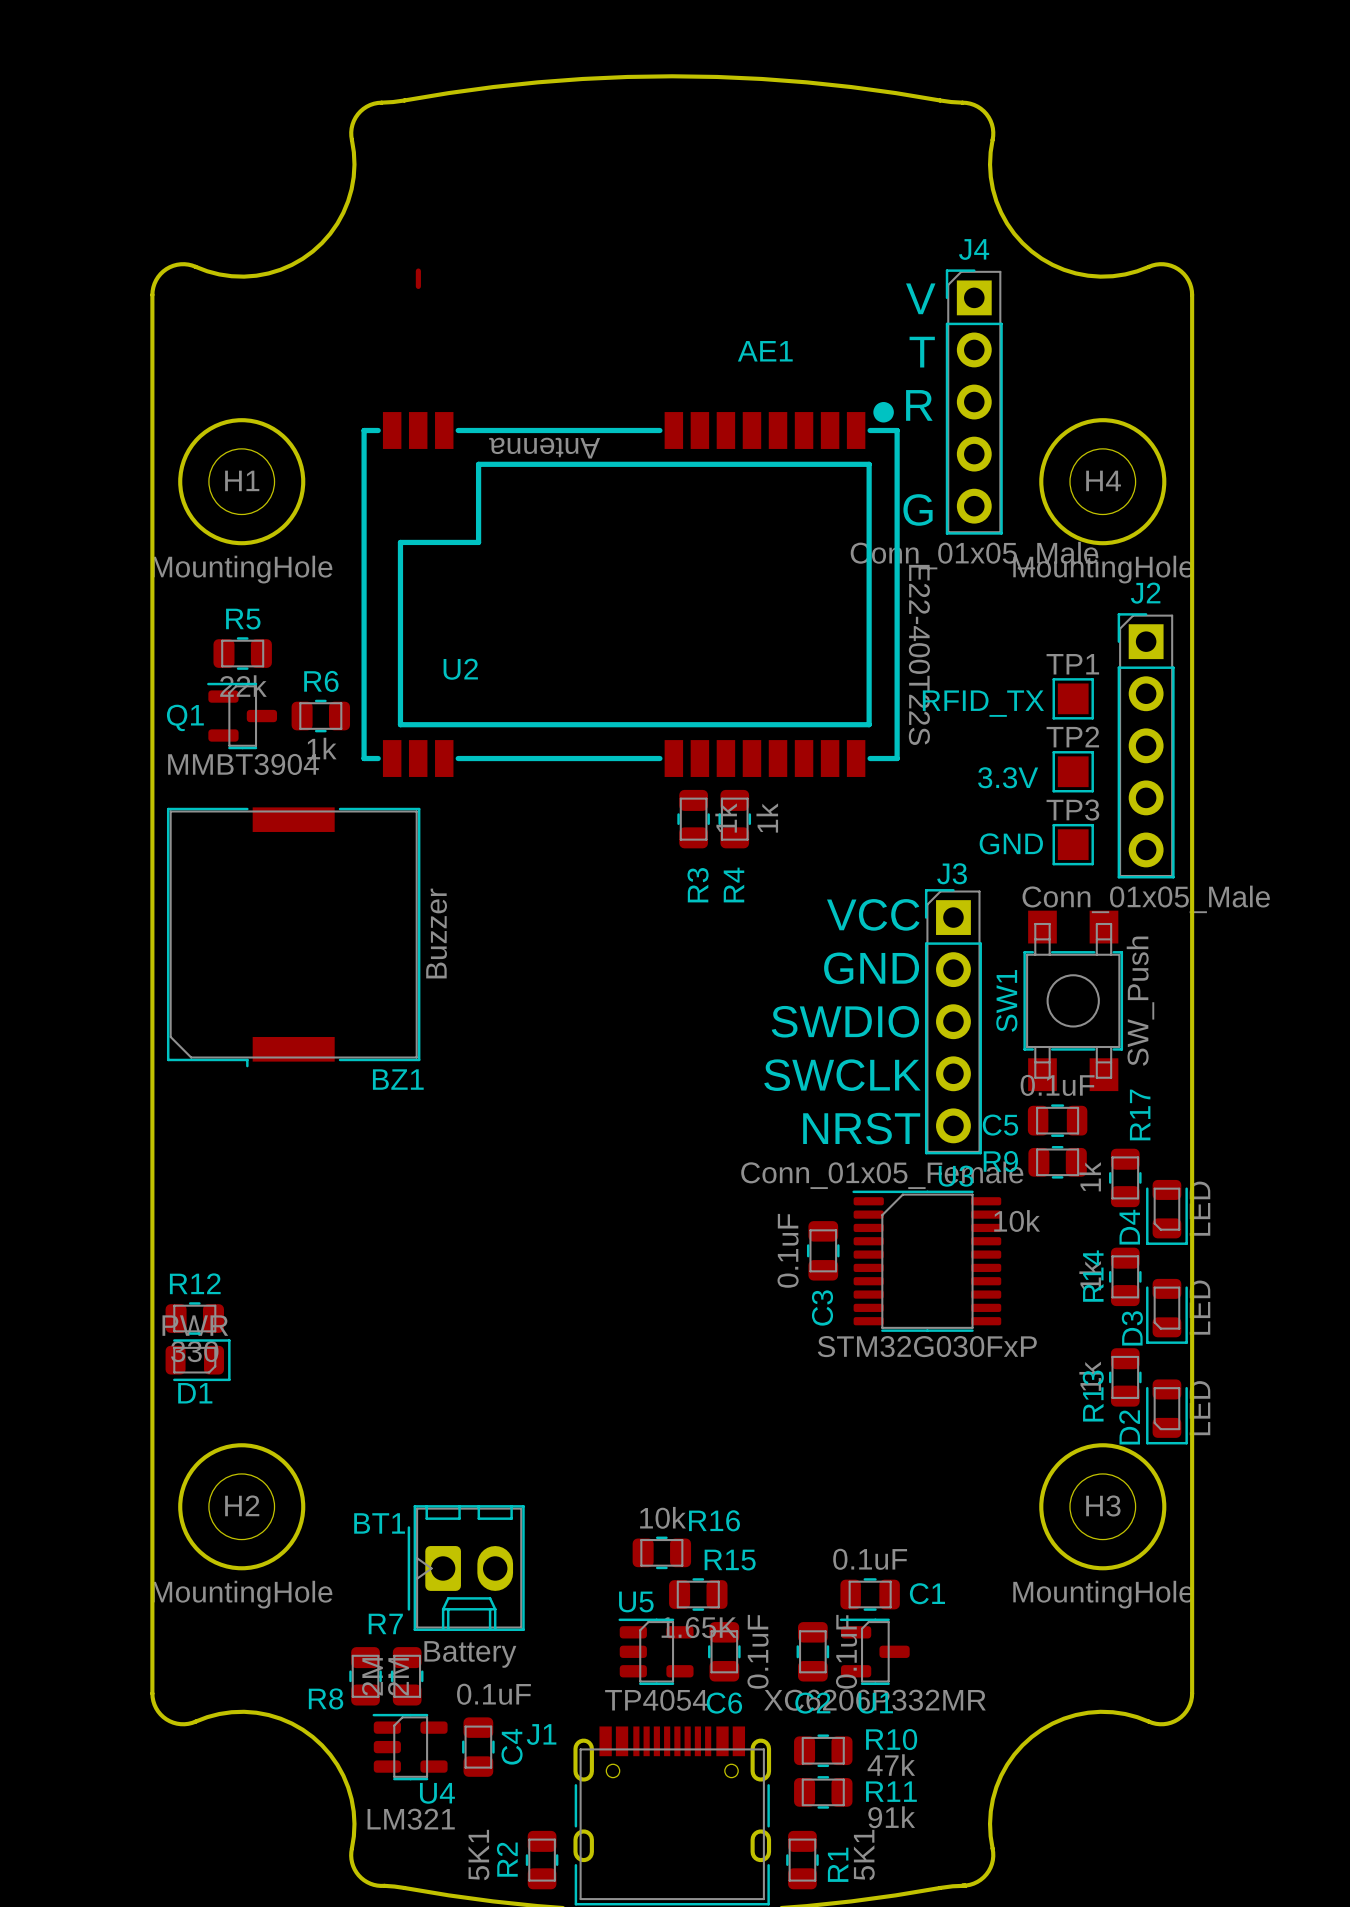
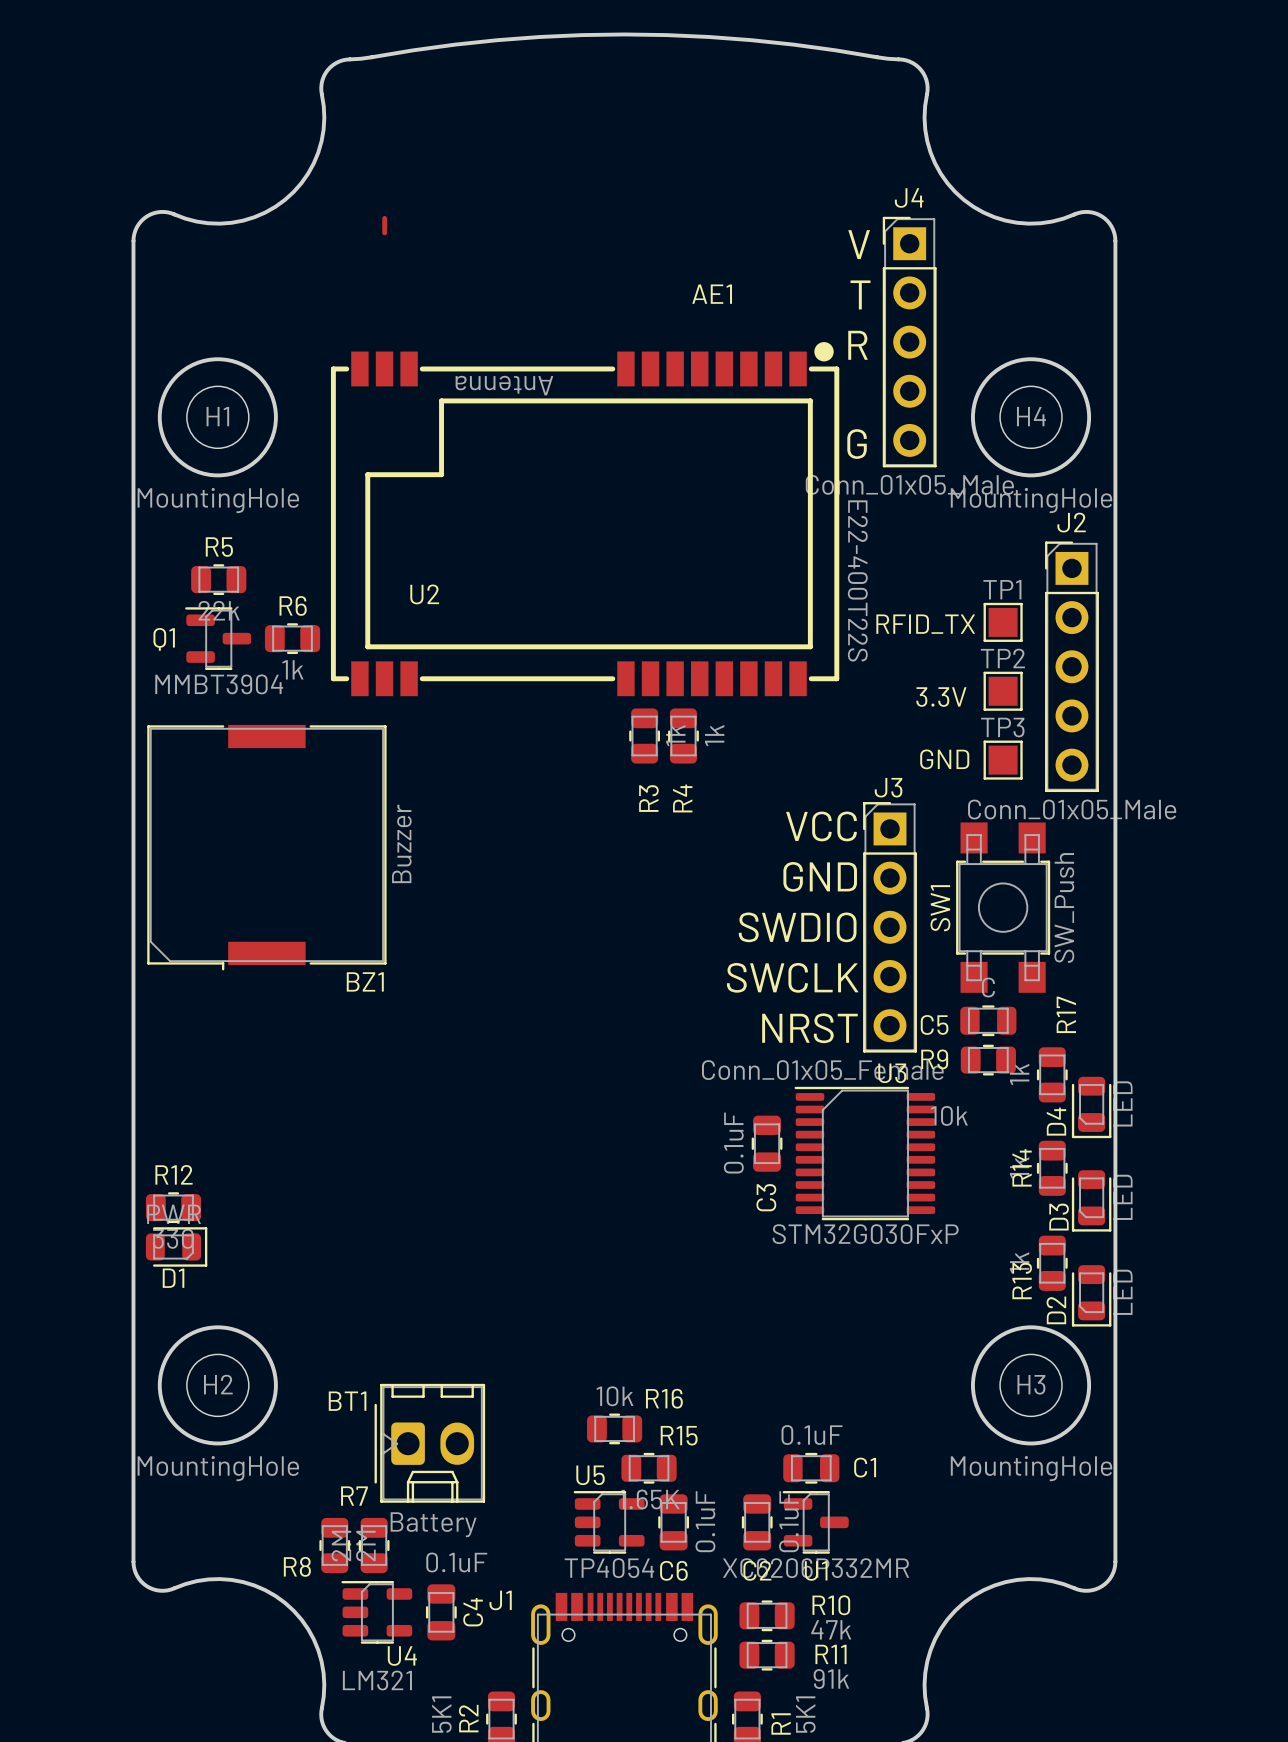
C5 value: 0.1uF (1057, 1085) -> C (988, 987)

